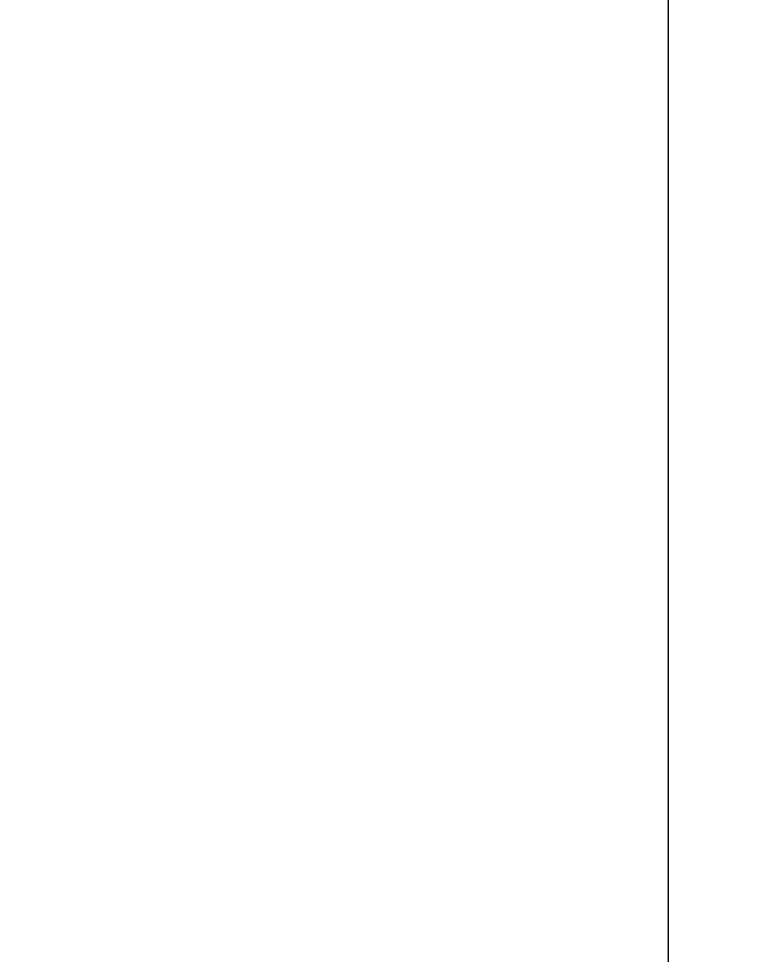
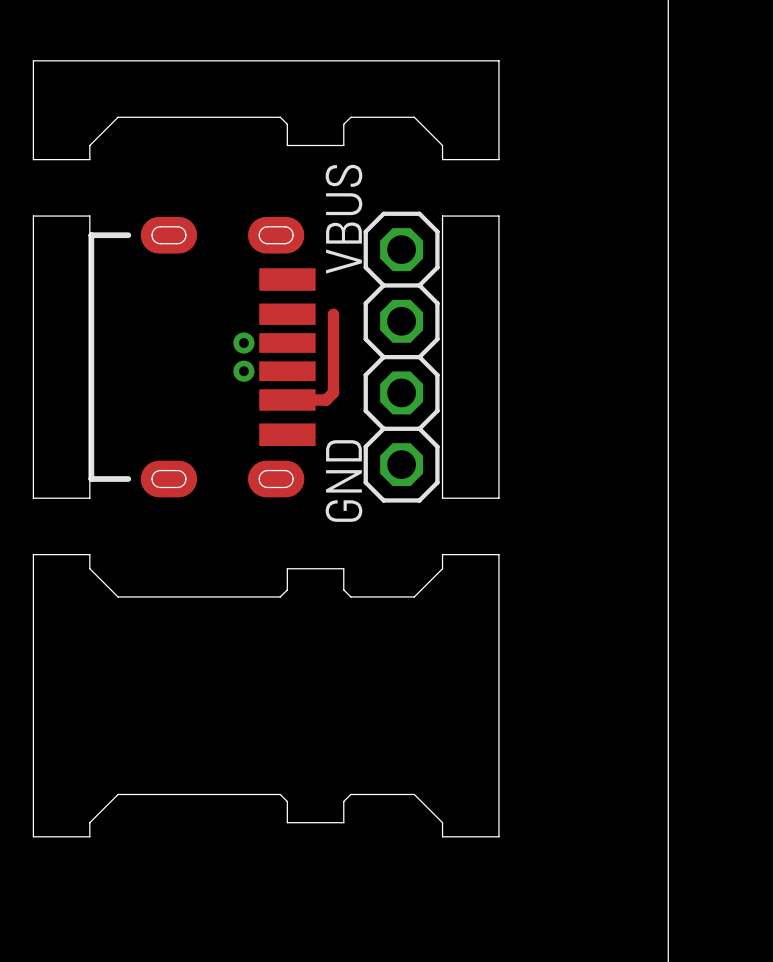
board edge: none -> (33, 60) (33, 159) (89, 159) (89, 145) (118, 117) (280, 117) (287, 124) (287, 145) (343, 145) (343, 124) (350, 117) (414, 117) (442, 145) (442, 159) (498, 159) (498, 60) (33, 60)
board edge: none -> (33, 216) (33, 498) (89, 498) (89, 216) (33, 216)
board edge: none -> (442, 216) (442, 498) (498, 498) (498, 216) (442, 216)
text: none -> VBUS (343, 219)
track: none -> (333, 314) (333, 392) (326, 400) (287, 400)
via: none -> (243, 343)
part: none -> (202, 357)
part: none -> (401, 357)
via: none -> (243, 371)
text: none -> GND (343, 481)
board edge: none -> (33, 554) (33, 836) (89, 836) (89, 822) (118, 794) (280, 794) (287, 801) (287, 822) (343, 822) (343, 801) (350, 794) (414, 794) (442, 822) (442, 836) (498, 836) (498, 554) (442, 554) (442, 568) (414, 596) (350, 596) (343, 589) (343, 568) (287, 568) (287, 589) (280, 596) (118, 596) (89, 568) (89, 554) (33, 554)

